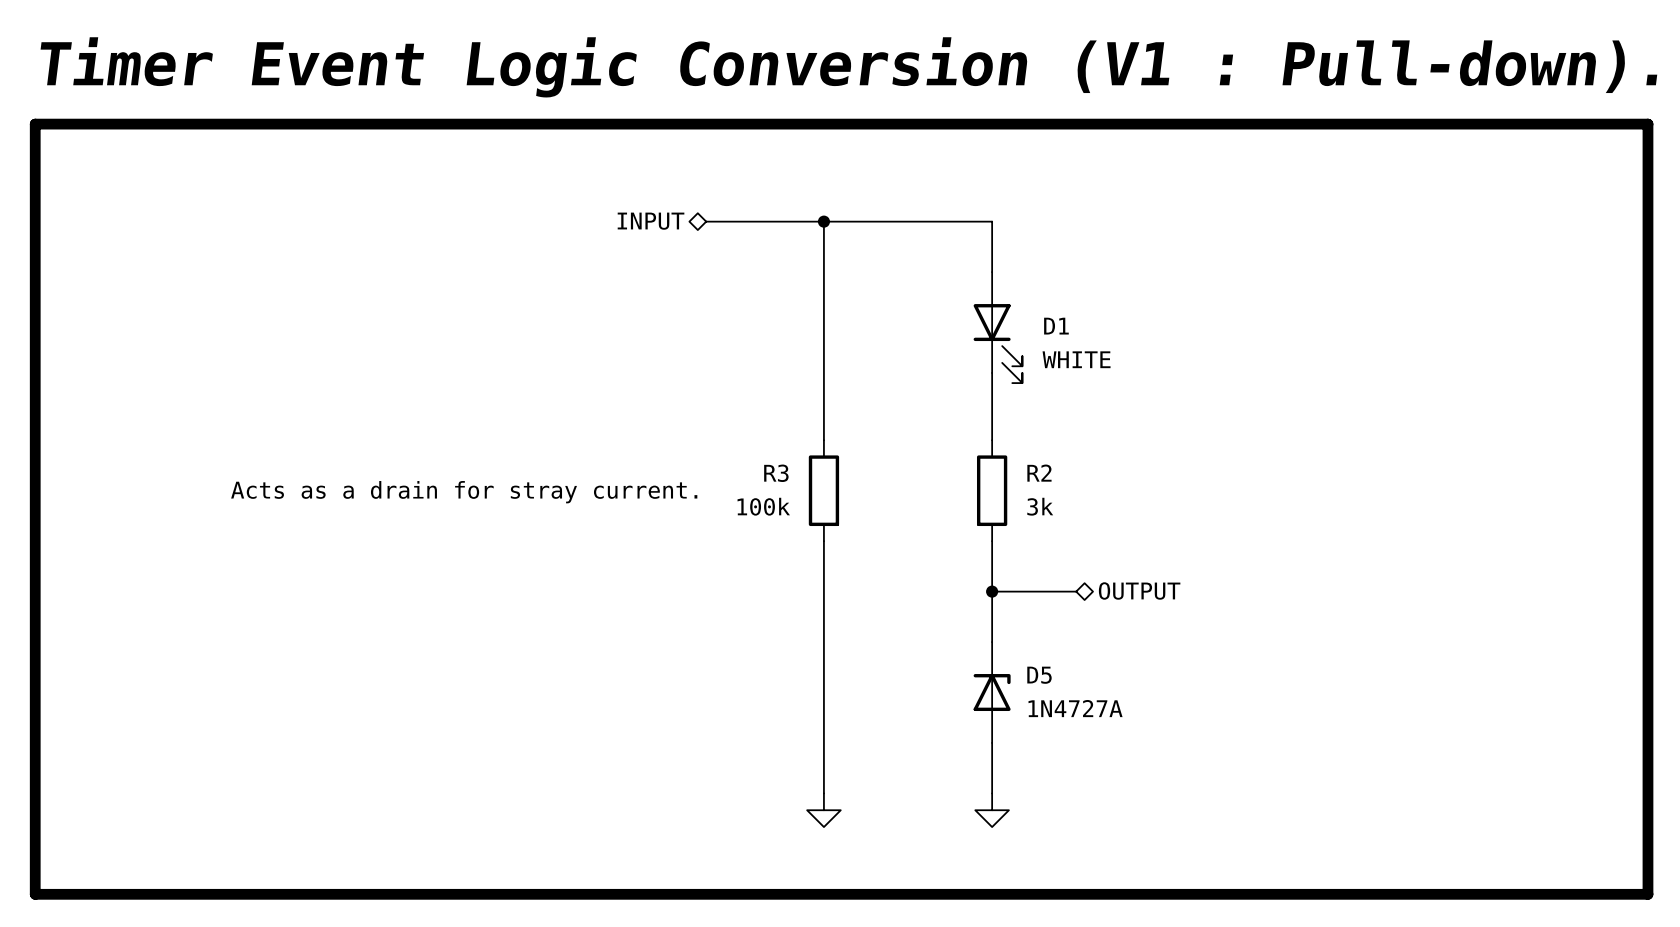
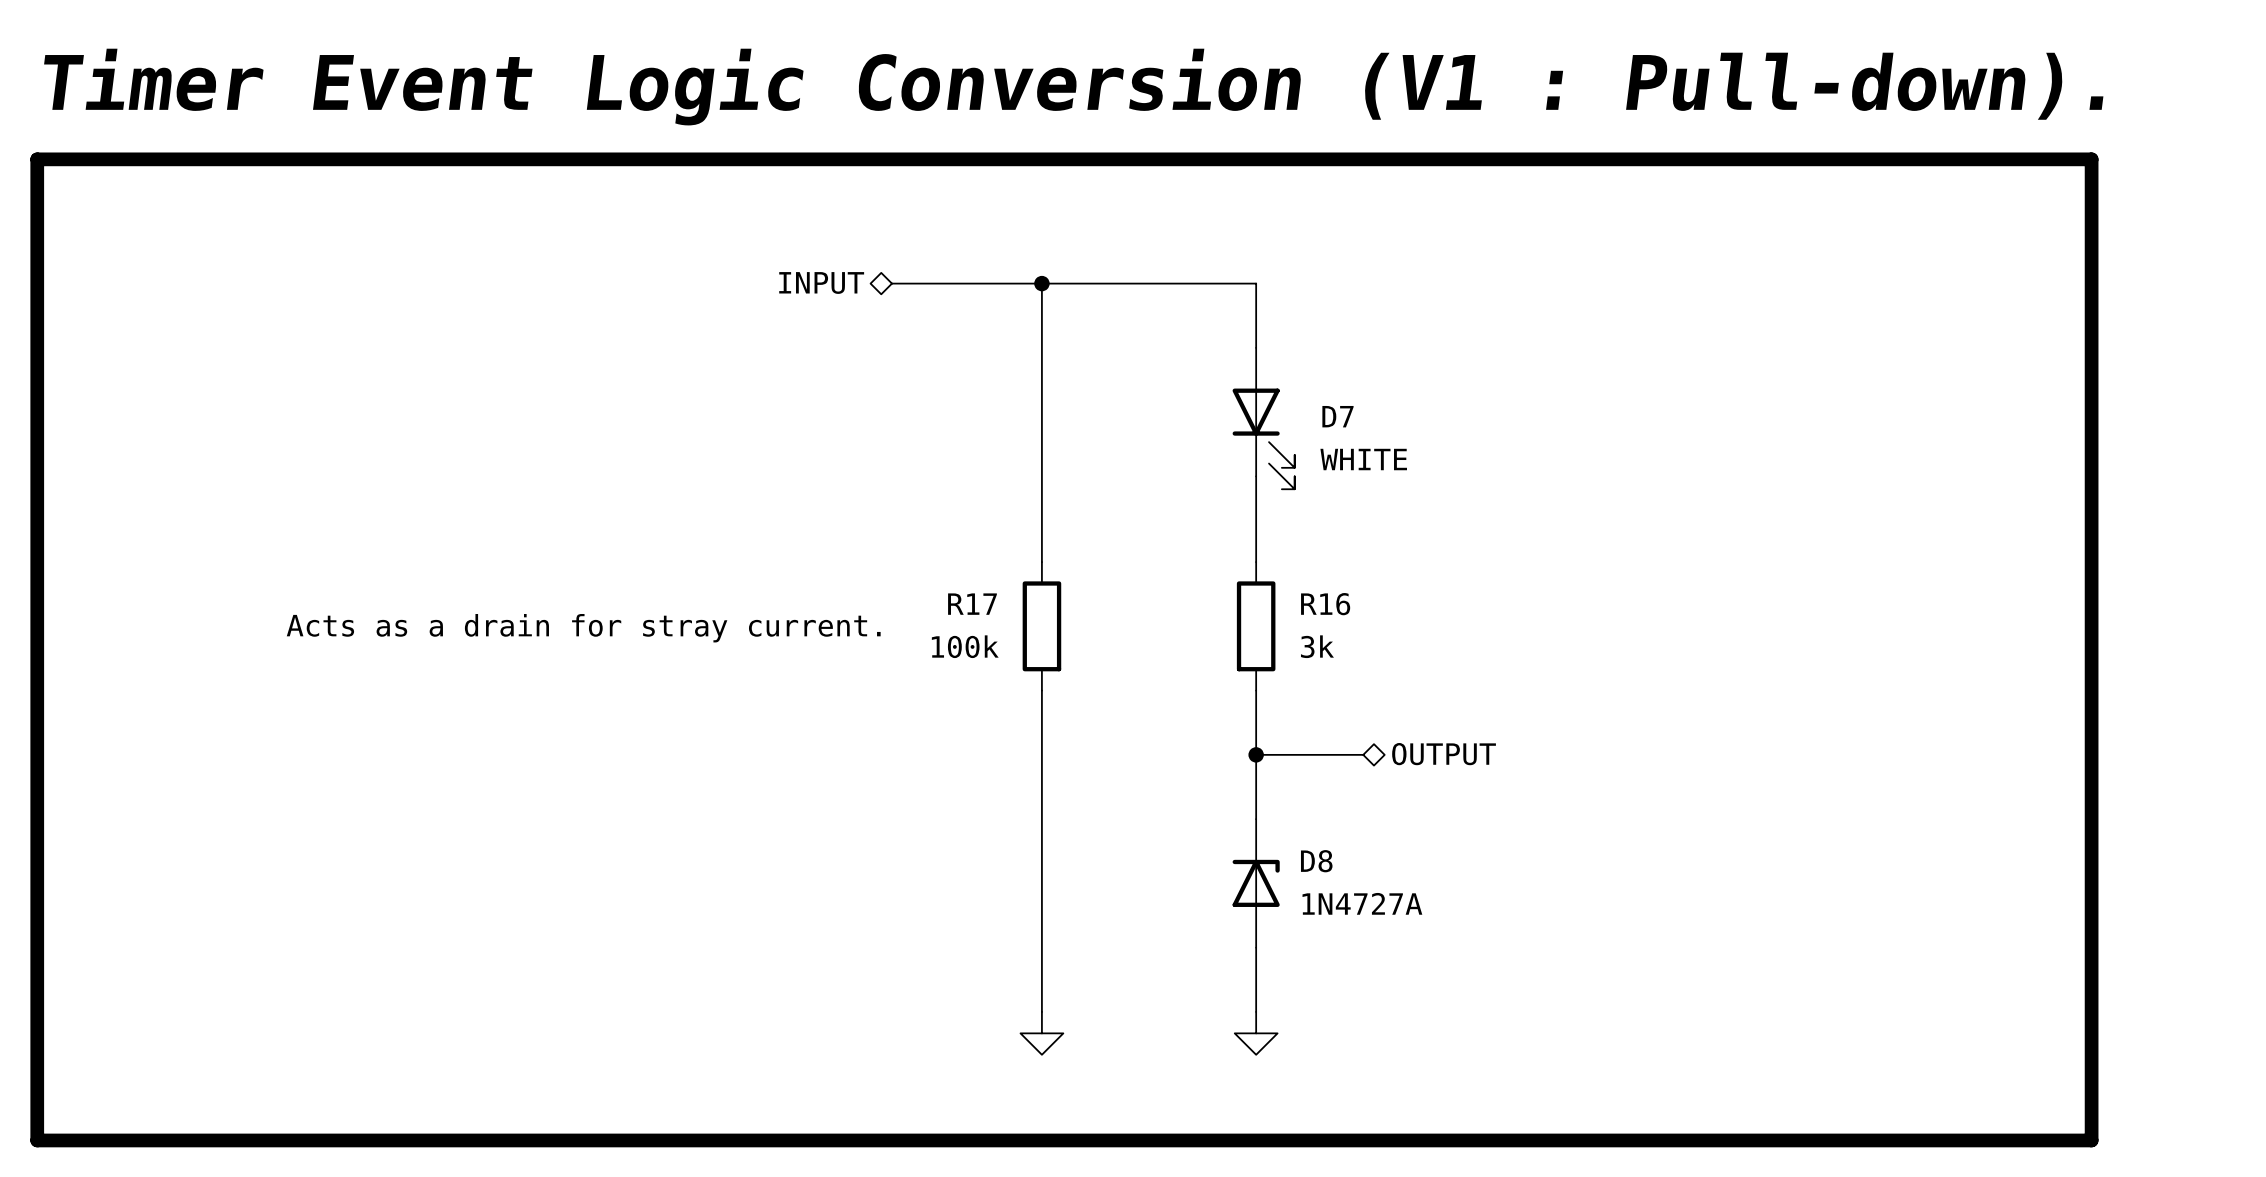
D1 name: D1 (1056, 326) -> D7 (1337, 416)
R3 name: R3 (776, 473) -> R17 (972, 604)
R2 name: R2 (1039, 473) -> R16 (1325, 604)
D5 name: D5 (1039, 675) -> D8 (1316, 861)

